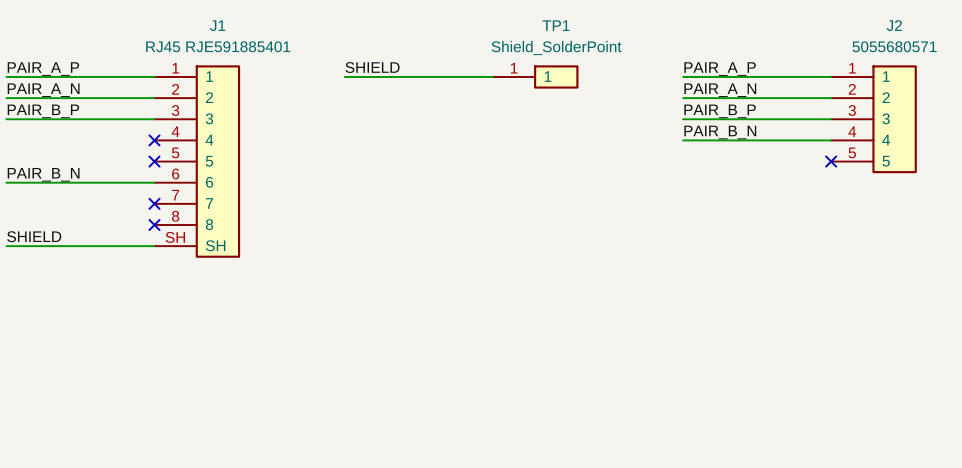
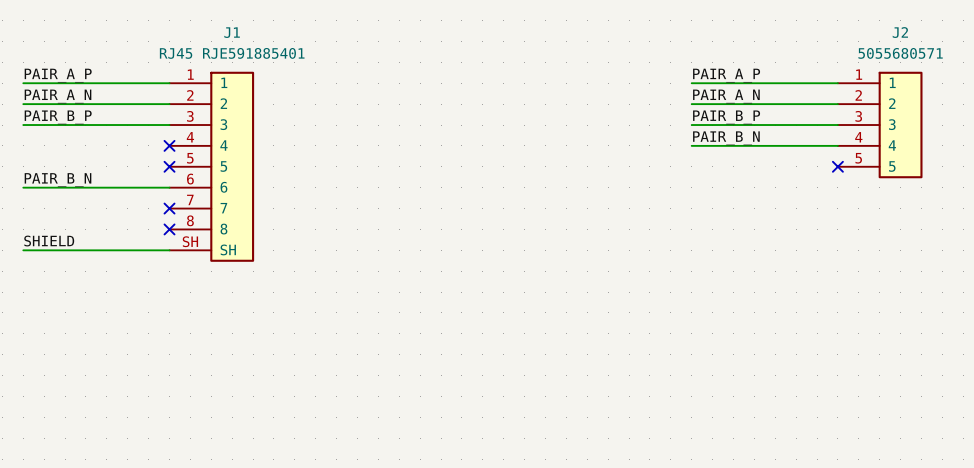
label: SHIELD (372, 67) -> none
wire: (344, 76) (492, 76) -> none
TP1: Shield_SolderPoint (535, 76) -> none

